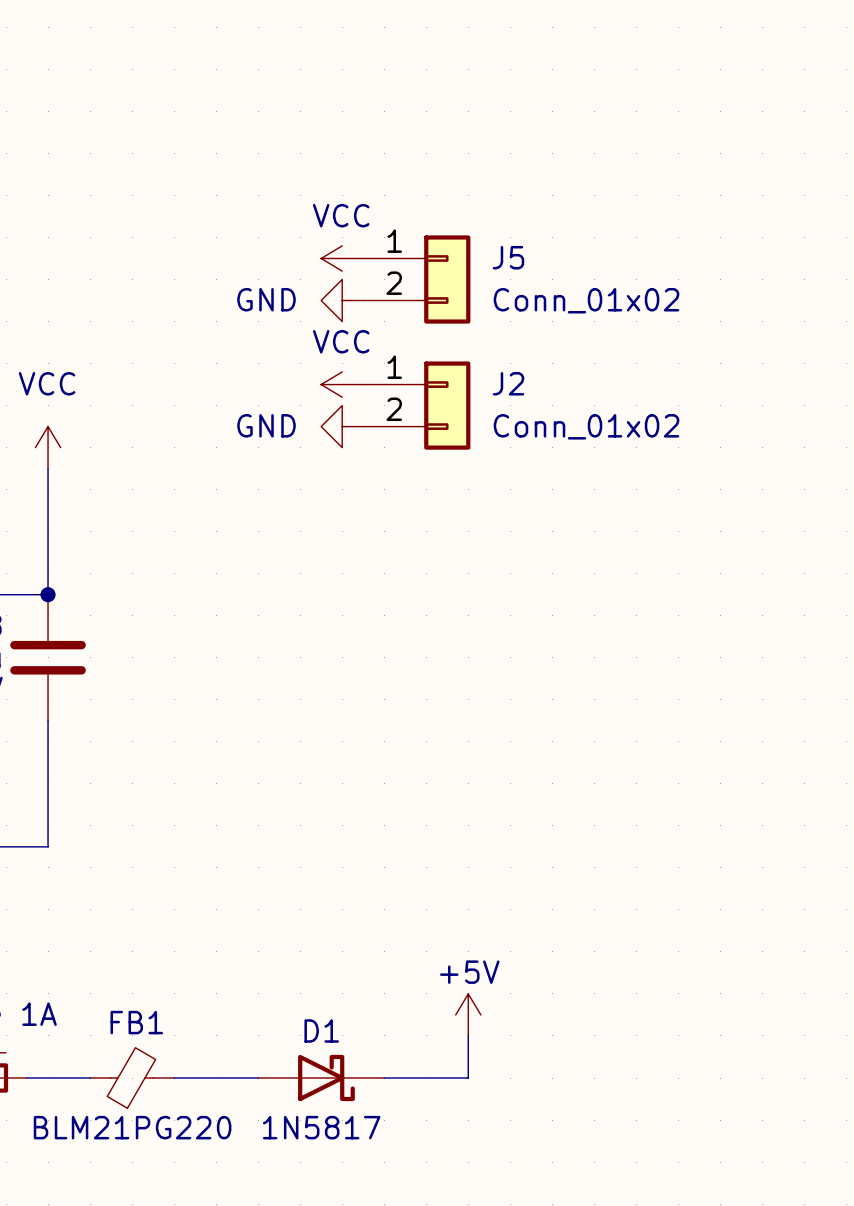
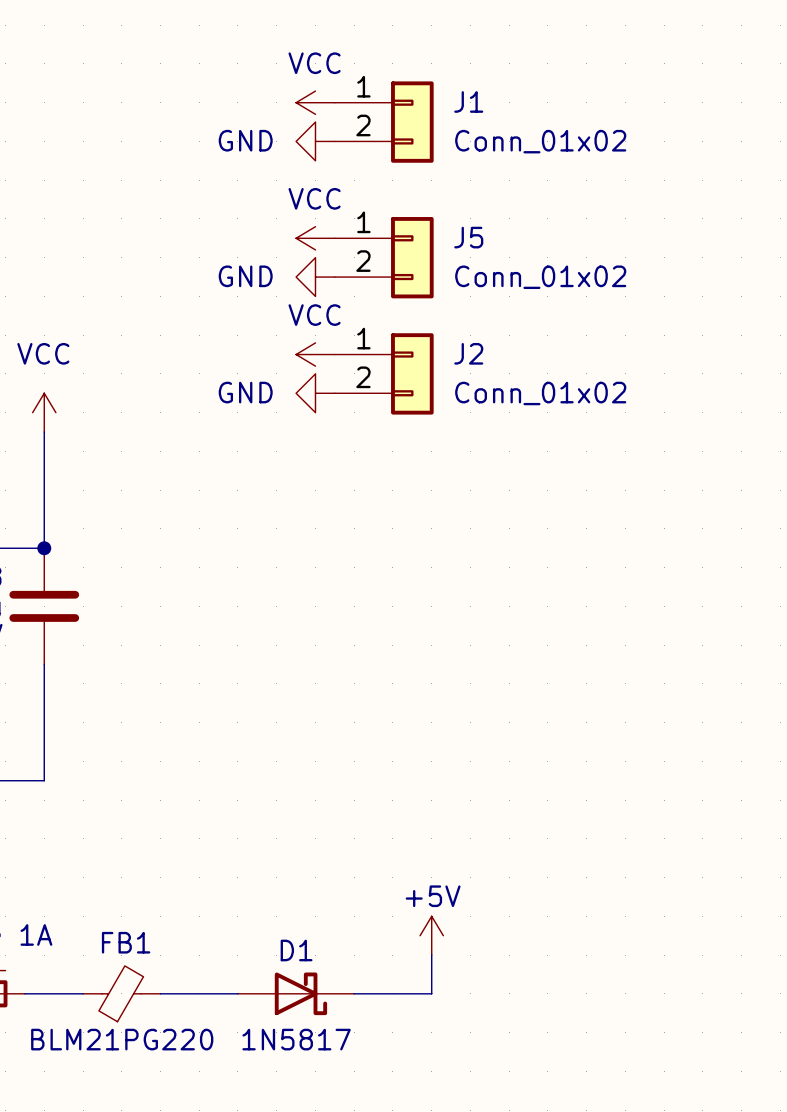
power symbol: none -> VCC (315, 102)
J1: none -> Conn_01x02 (384, 122)
power symbol: none -> GND (315, 141)

